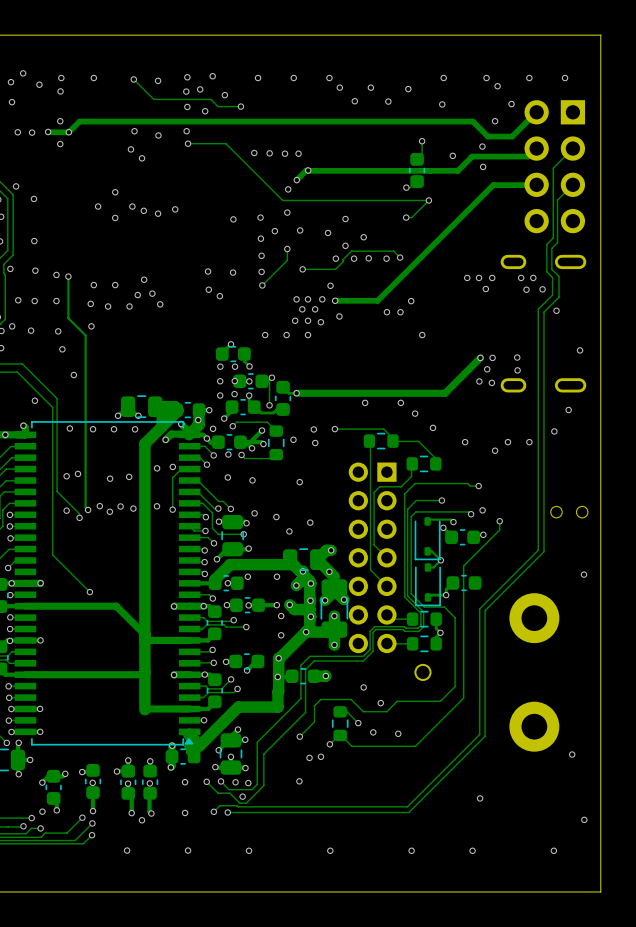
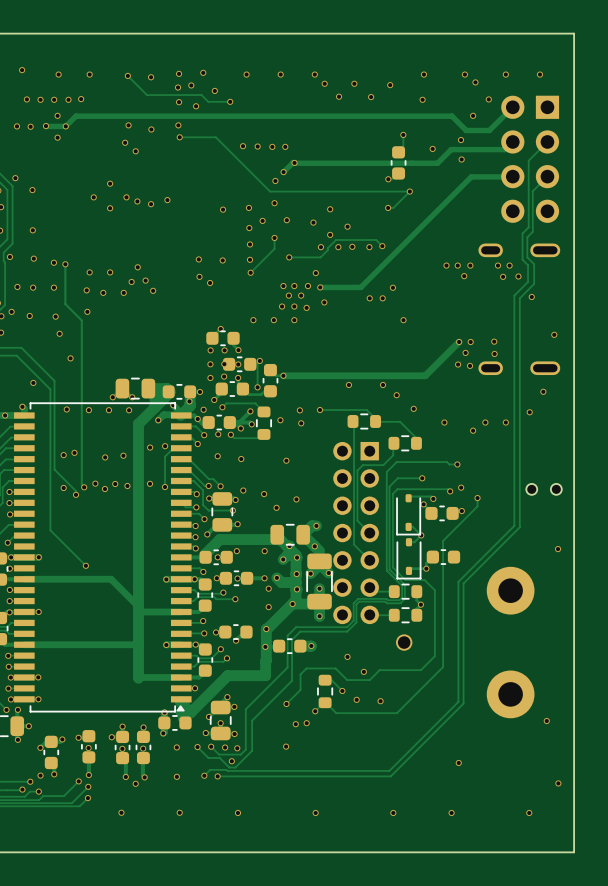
via: (11, 82) -> none
via: (39, 84) -> none
via: (60, 91) -> none
via: (12, 102) -> none
via: none -> (81, 99)
via: none -> (26, 99)
via: none -> (40, 99)
via: none -> (54, 99)
via: none -> (68, 99)

